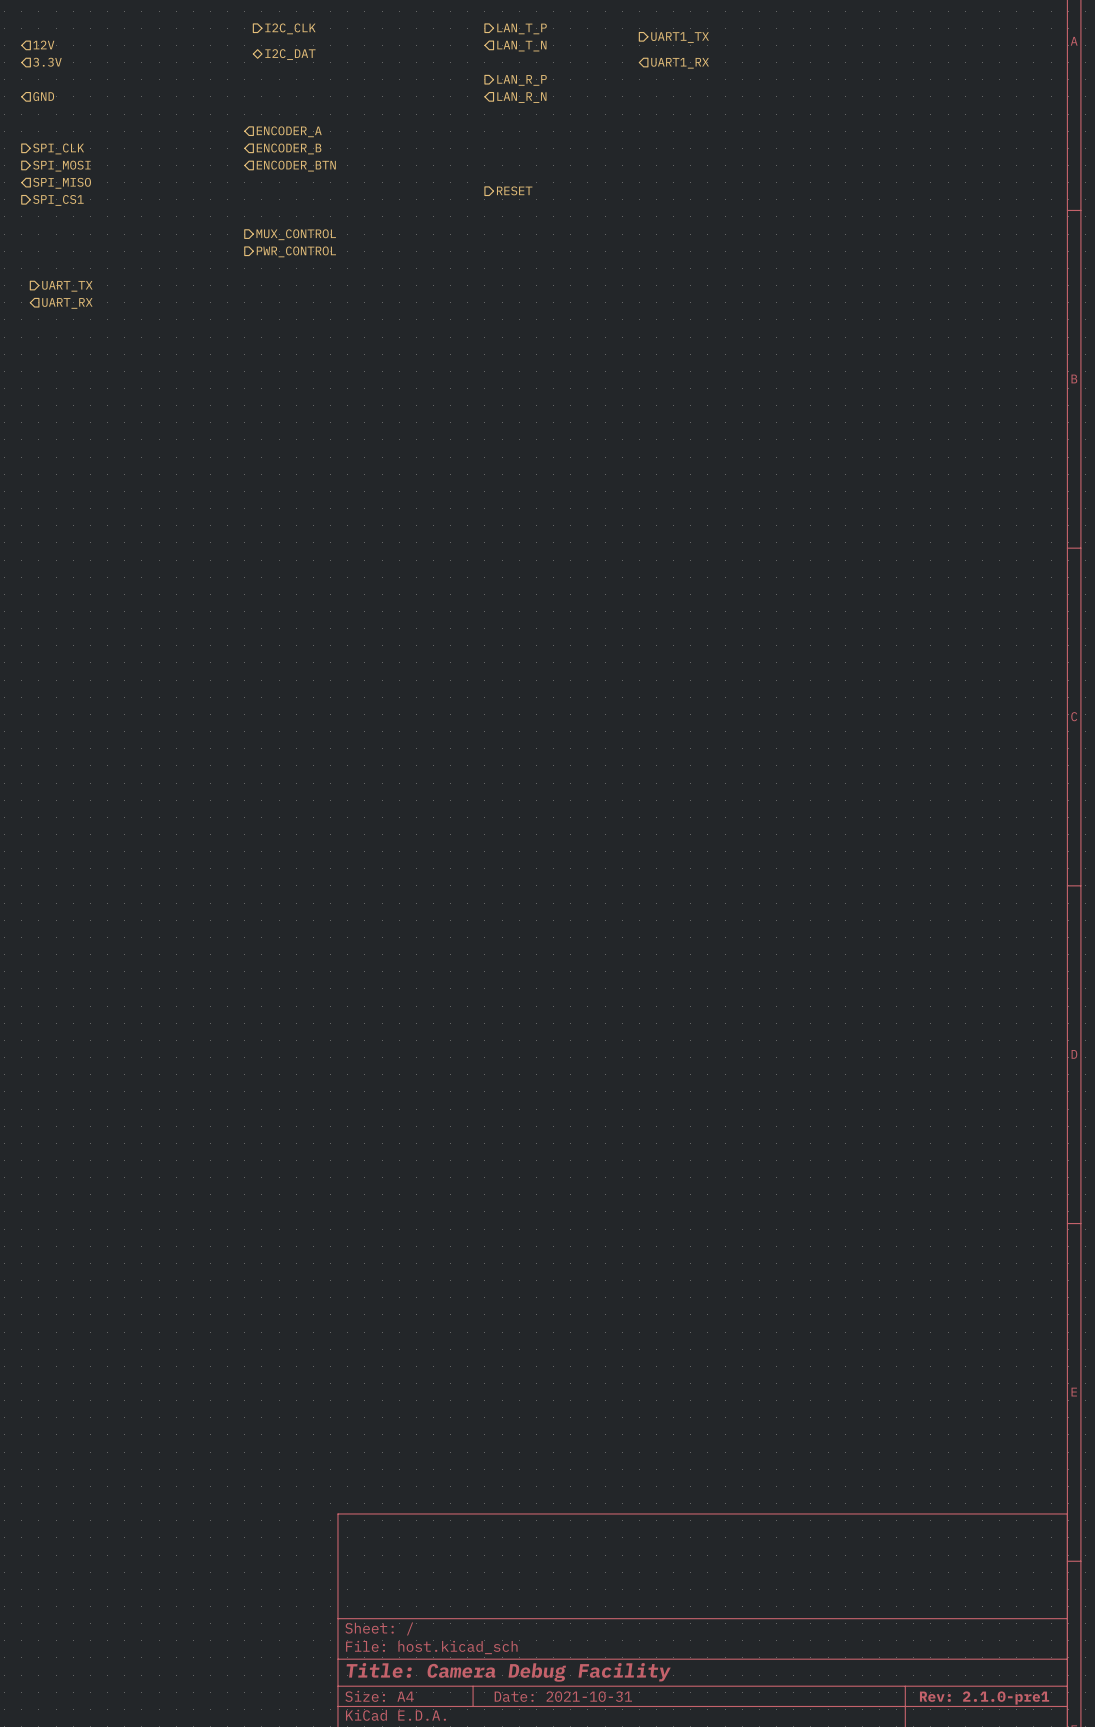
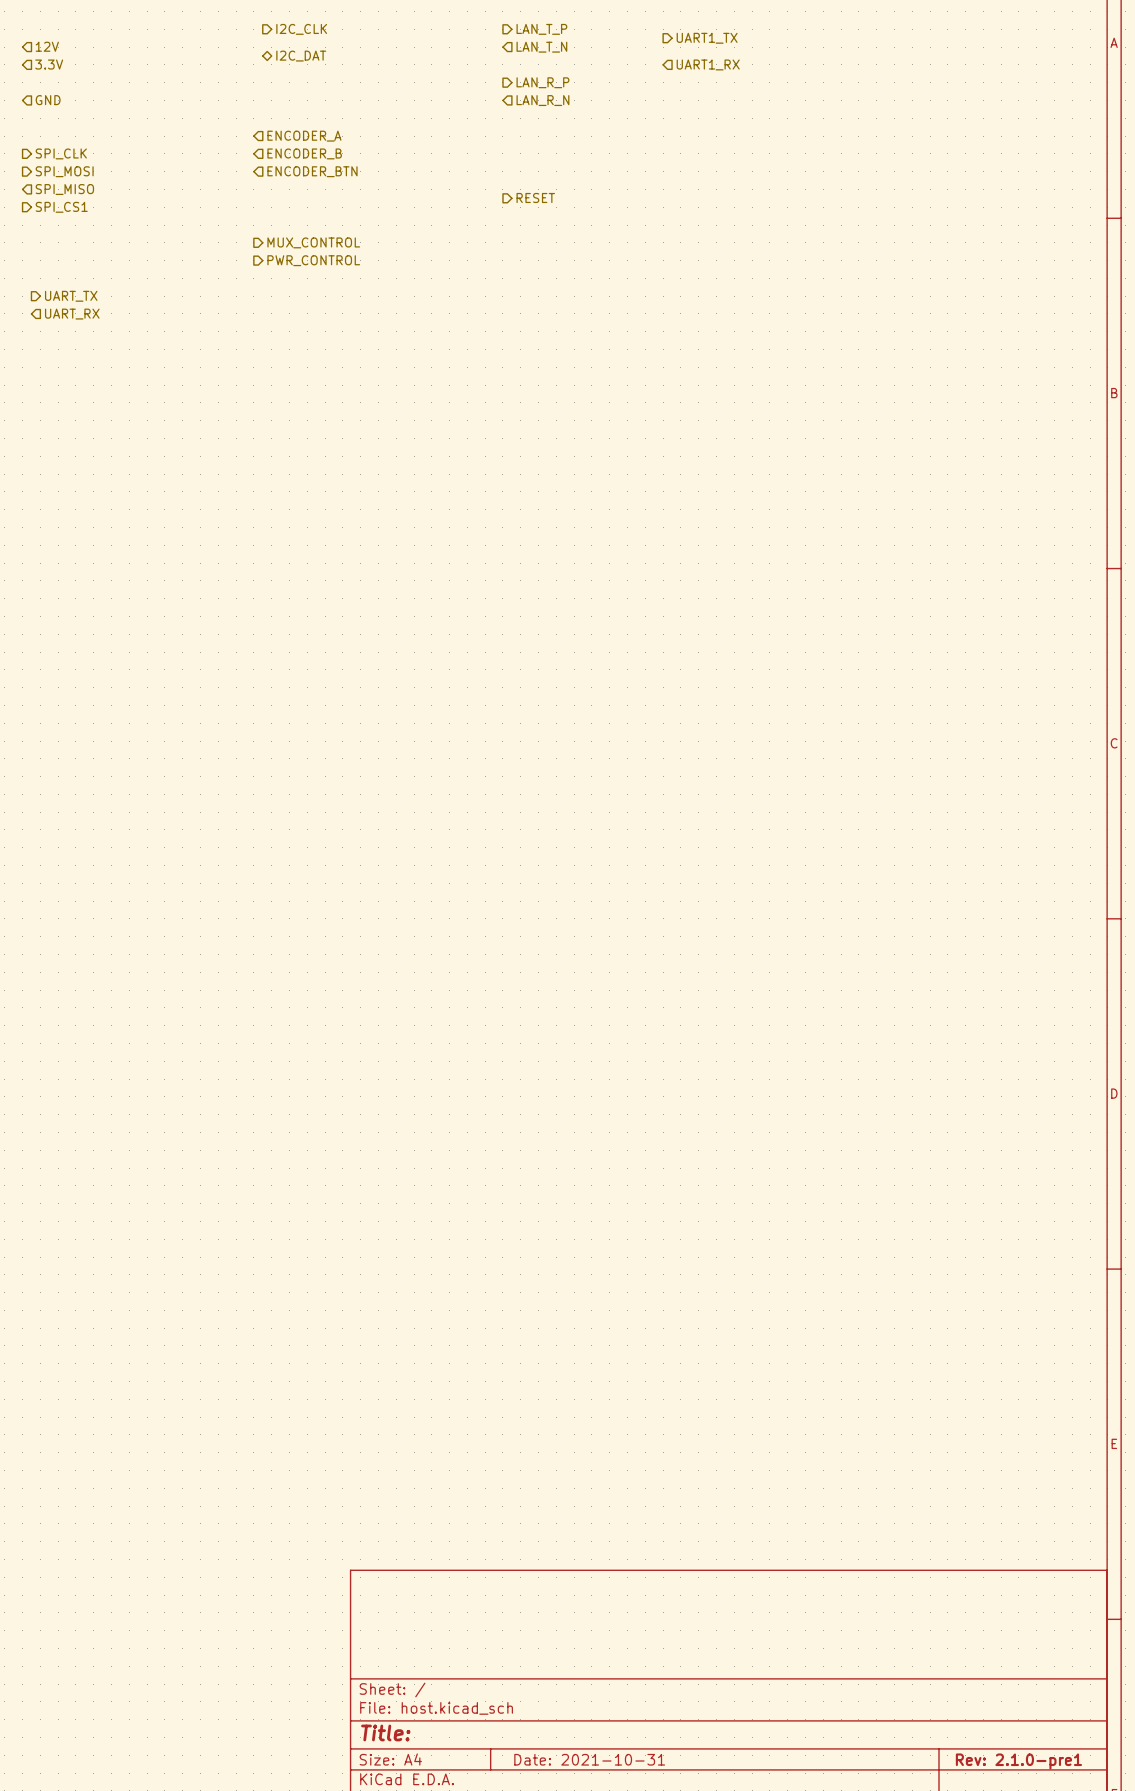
title block: Title: Camera Debug Facility (508, 1672) -> Title: (385, 1733)

